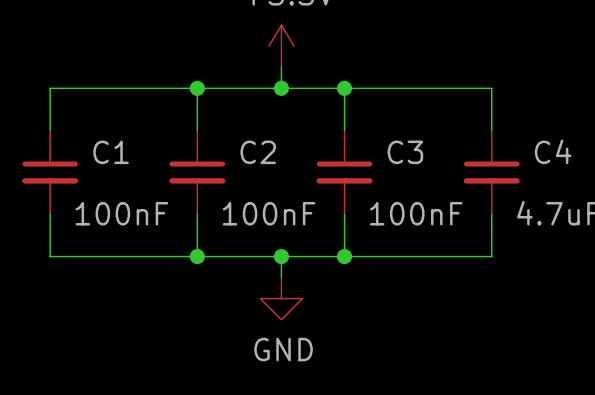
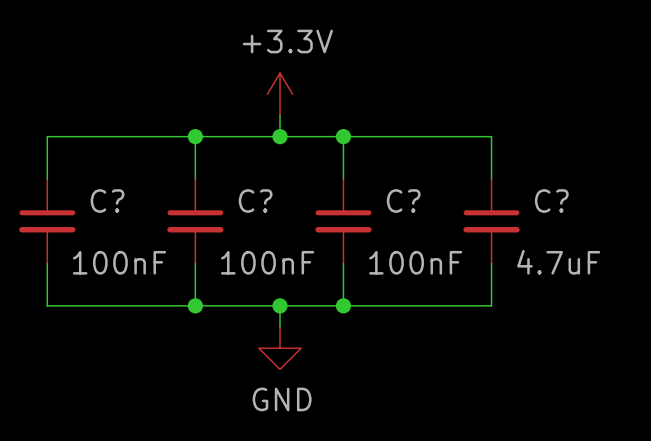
C4 name: C4 (553, 151) -> C? (551, 201)
C1 name: C1 (111, 152) -> C? (107, 201)
C2 name: C2 (258, 152) -> C? (255, 201)
C3 name: C3 (405, 152) -> C? (403, 201)

